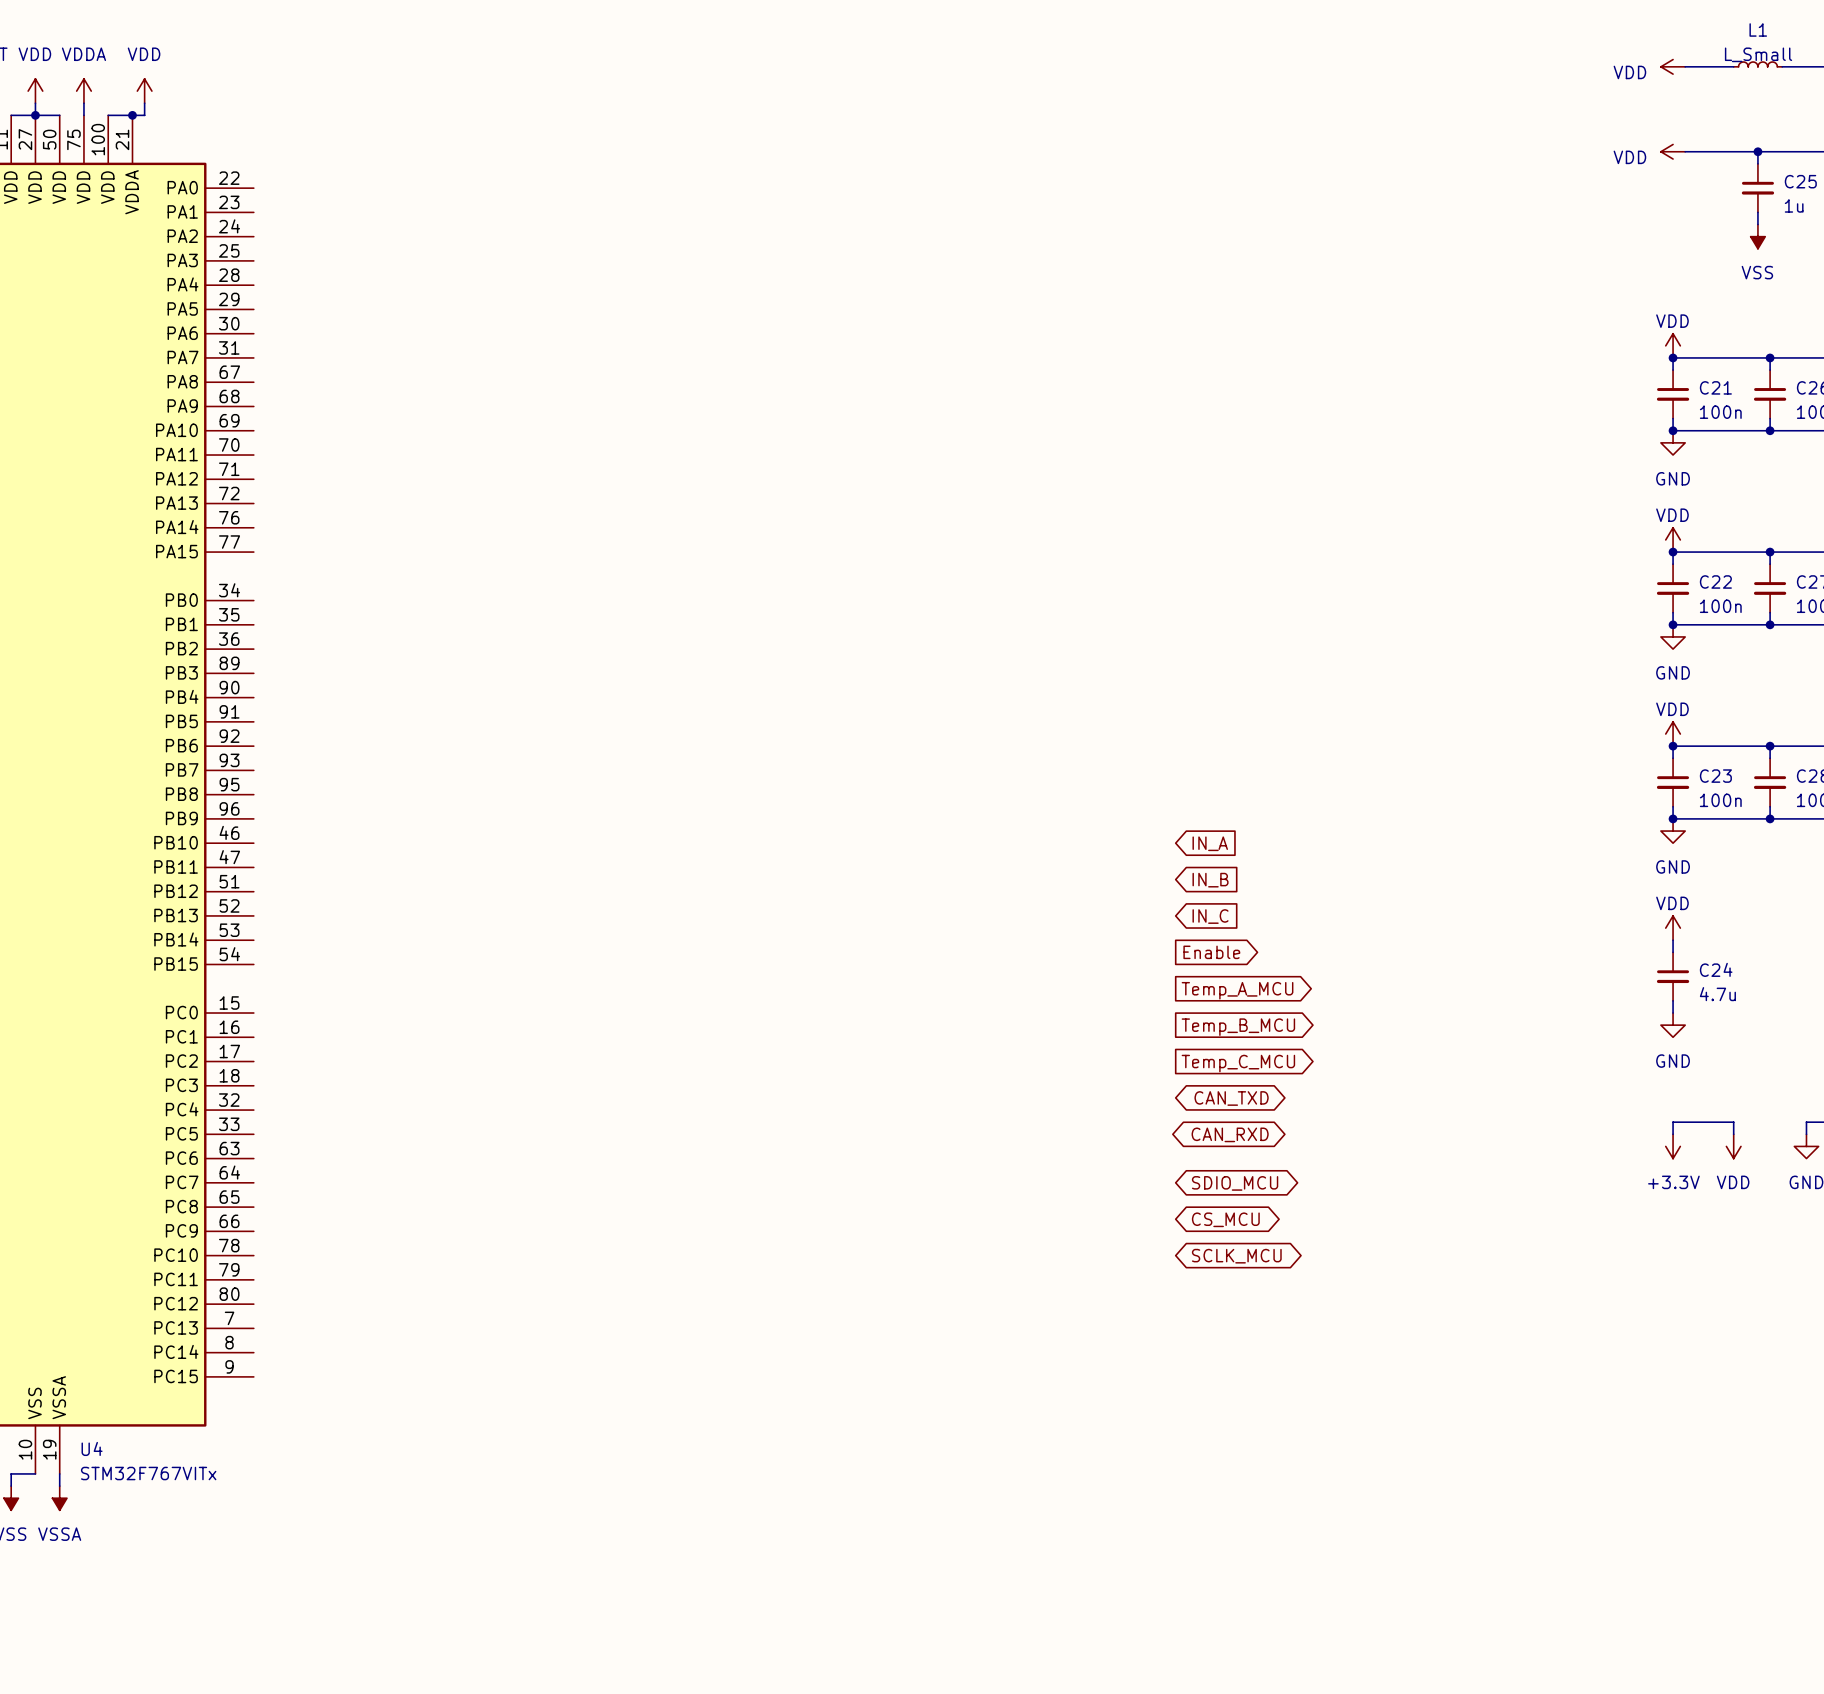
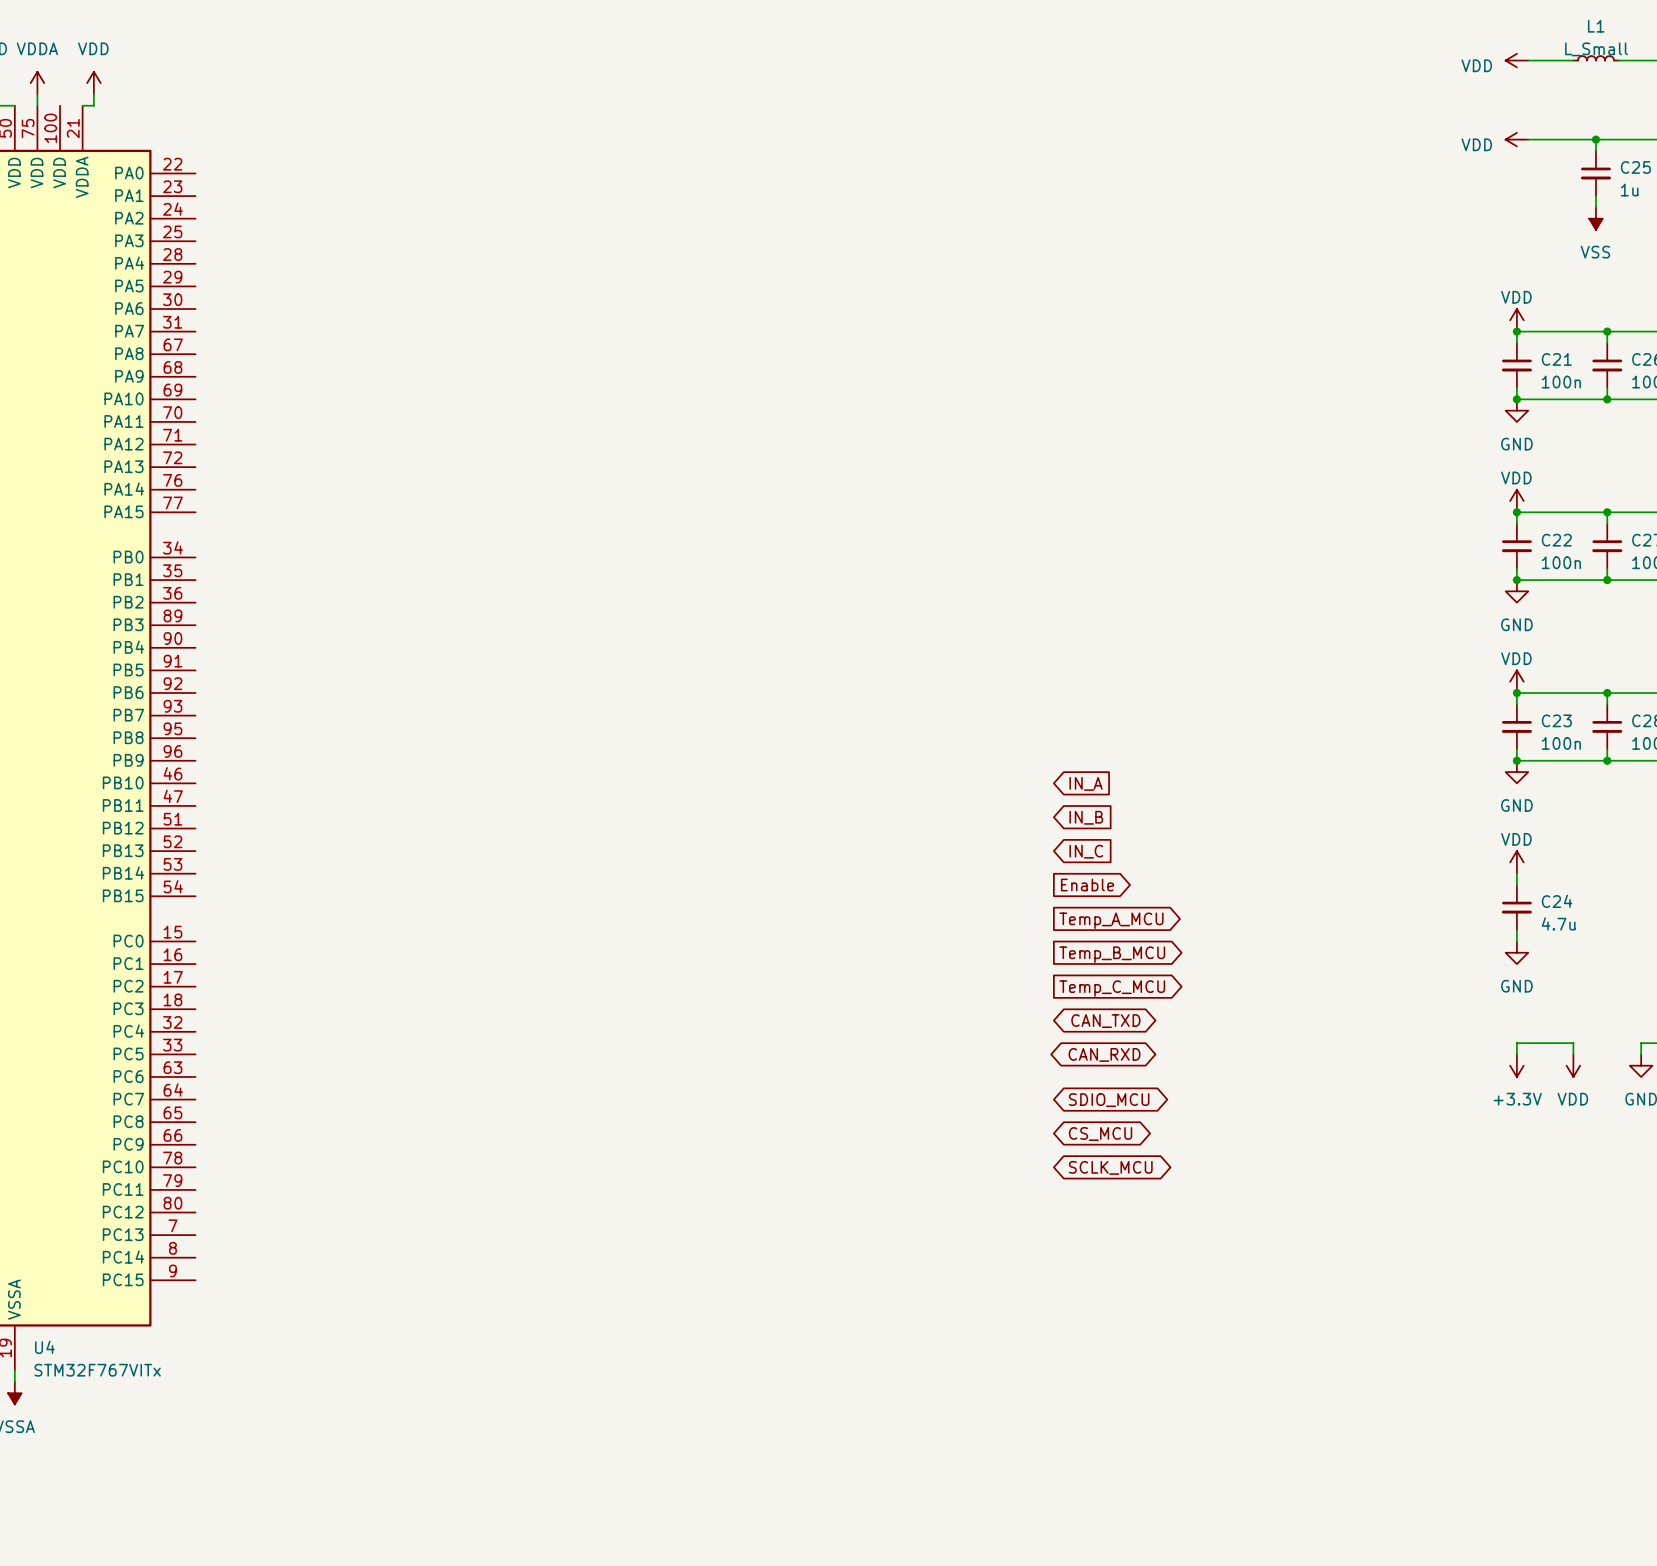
wire: (108, 115) (132, 115) -> none
junction: (132, 115) -> none

